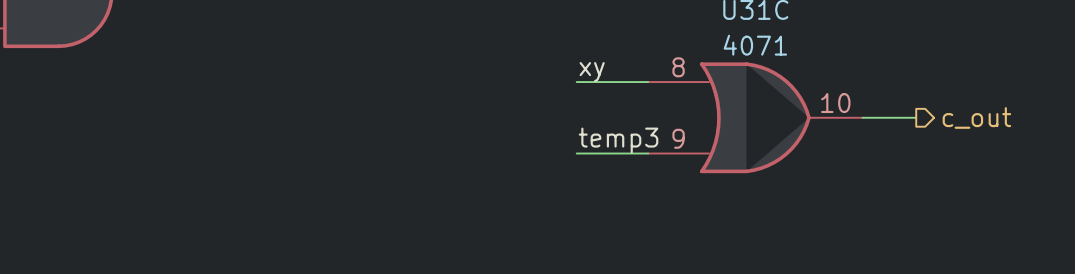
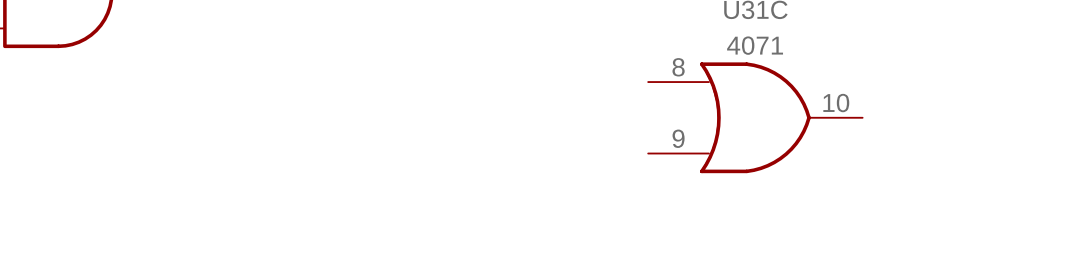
label: xy (592, 72) -> none
wire: (576, 82) (648, 82) -> none
wire: (862, 117) (916, 117) -> none
hierarchical label: c_out (976, 117) -> none
label: temp3 (618, 140) -> none
wire: (576, 153) (648, 153) -> none

